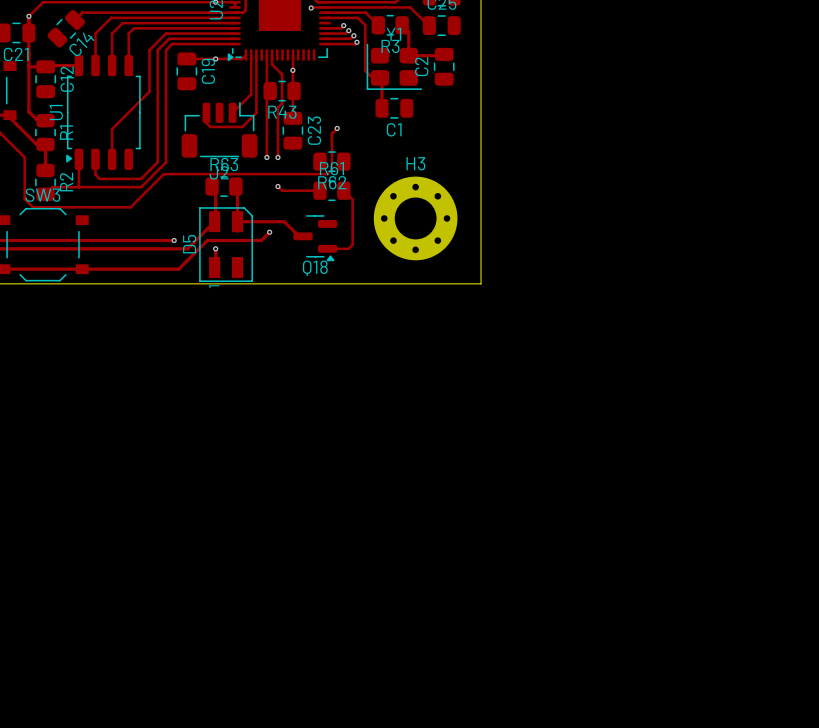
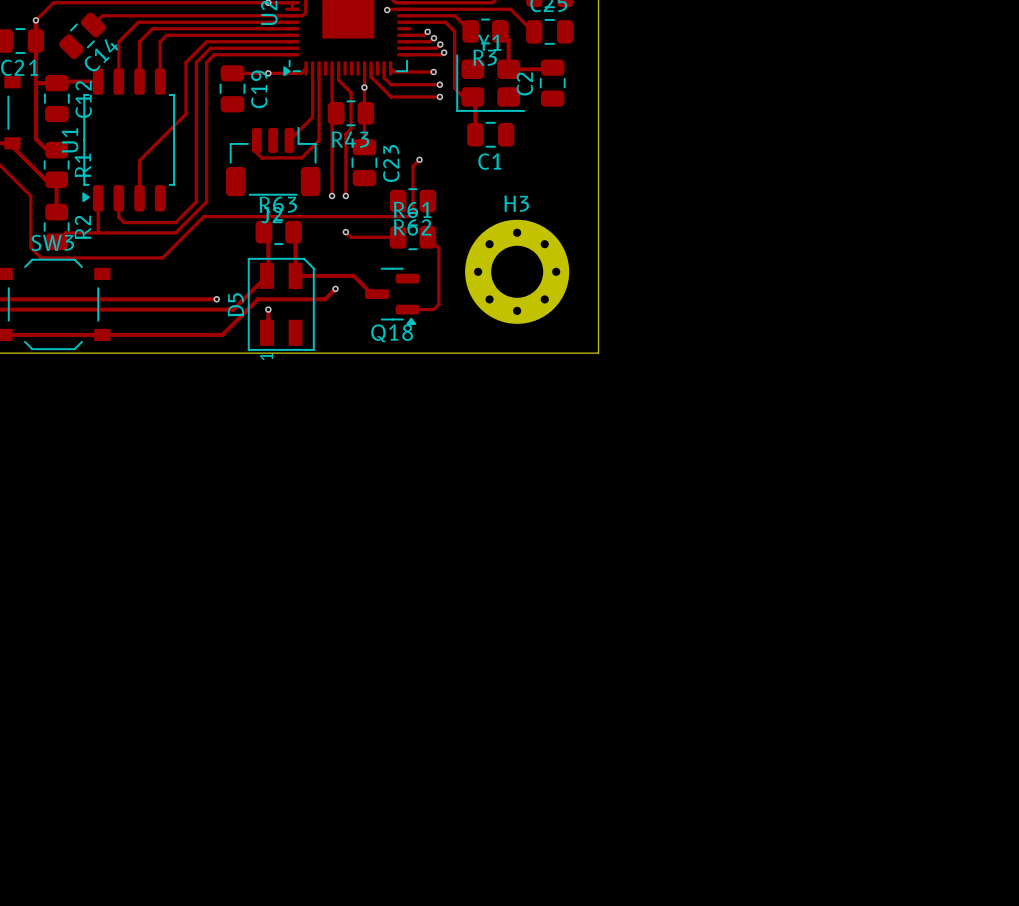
track: none -> (371, 68) (371, 76) (391, 96) (439, 96)
track: none -> (384, 68) (384, 77) (391, 84) (439, 84)
track: none -> (390, 68) (394, 72) (433, 72)
via: none -> (433, 72)
via: none -> (439, 84)
via: none -> (439, 96)

